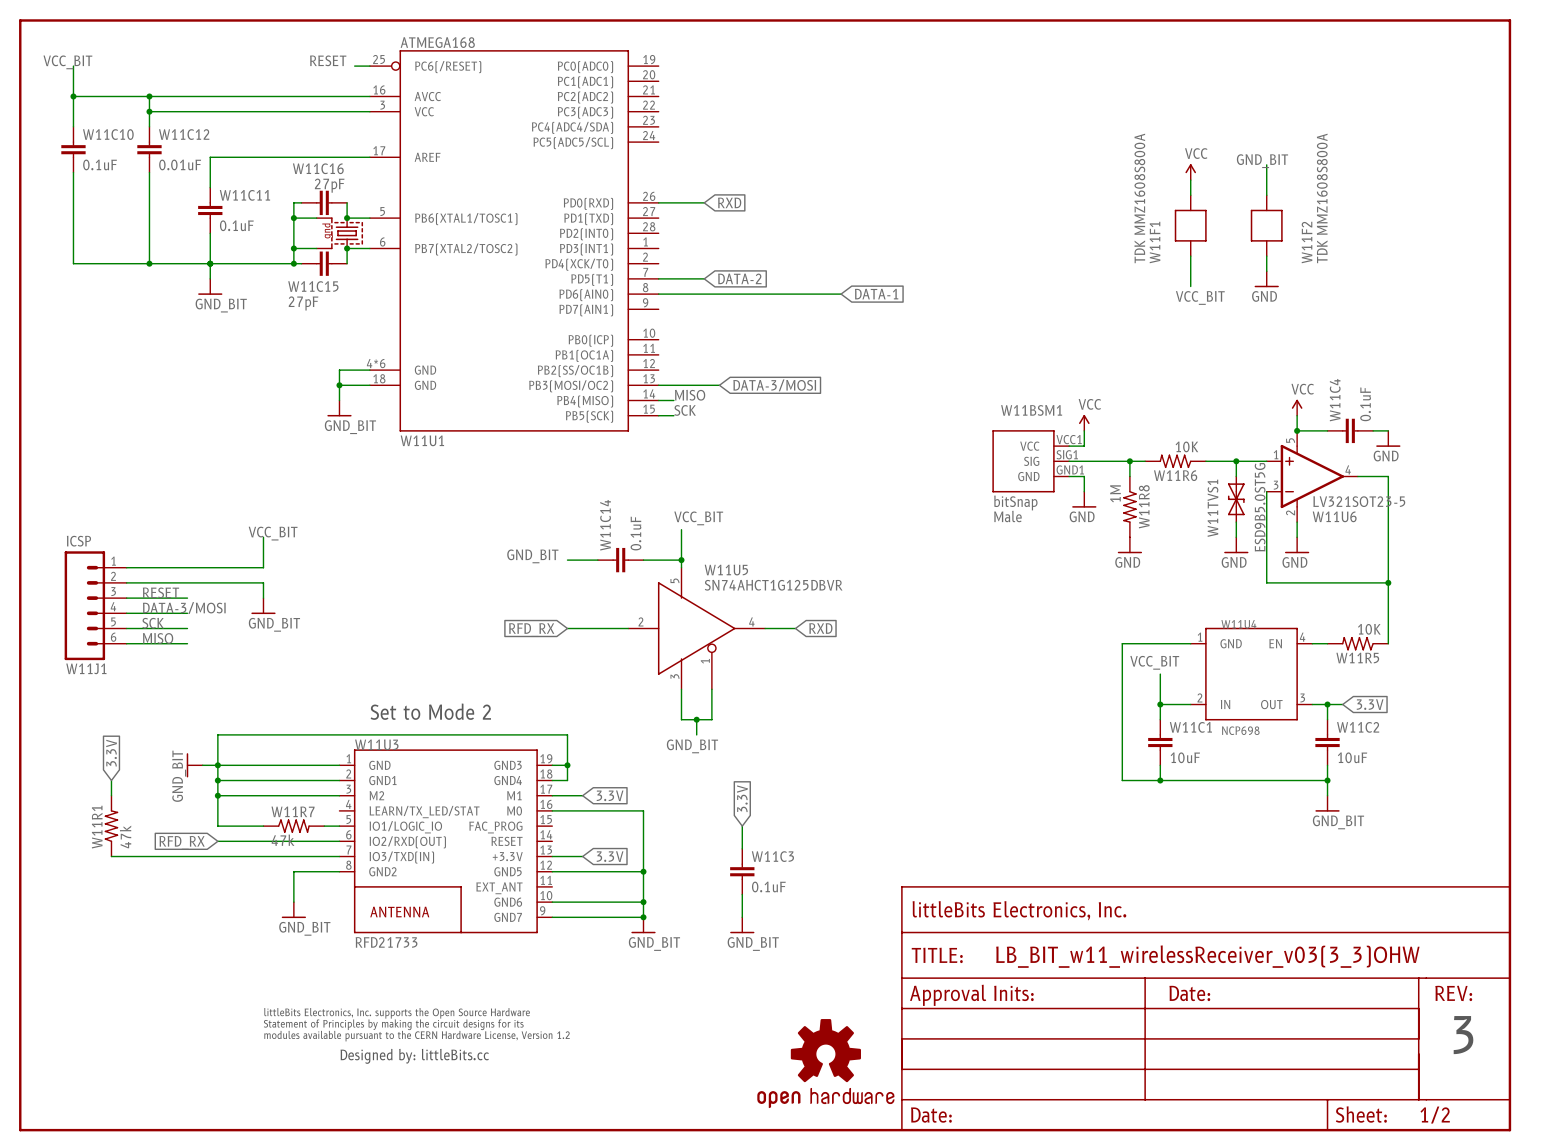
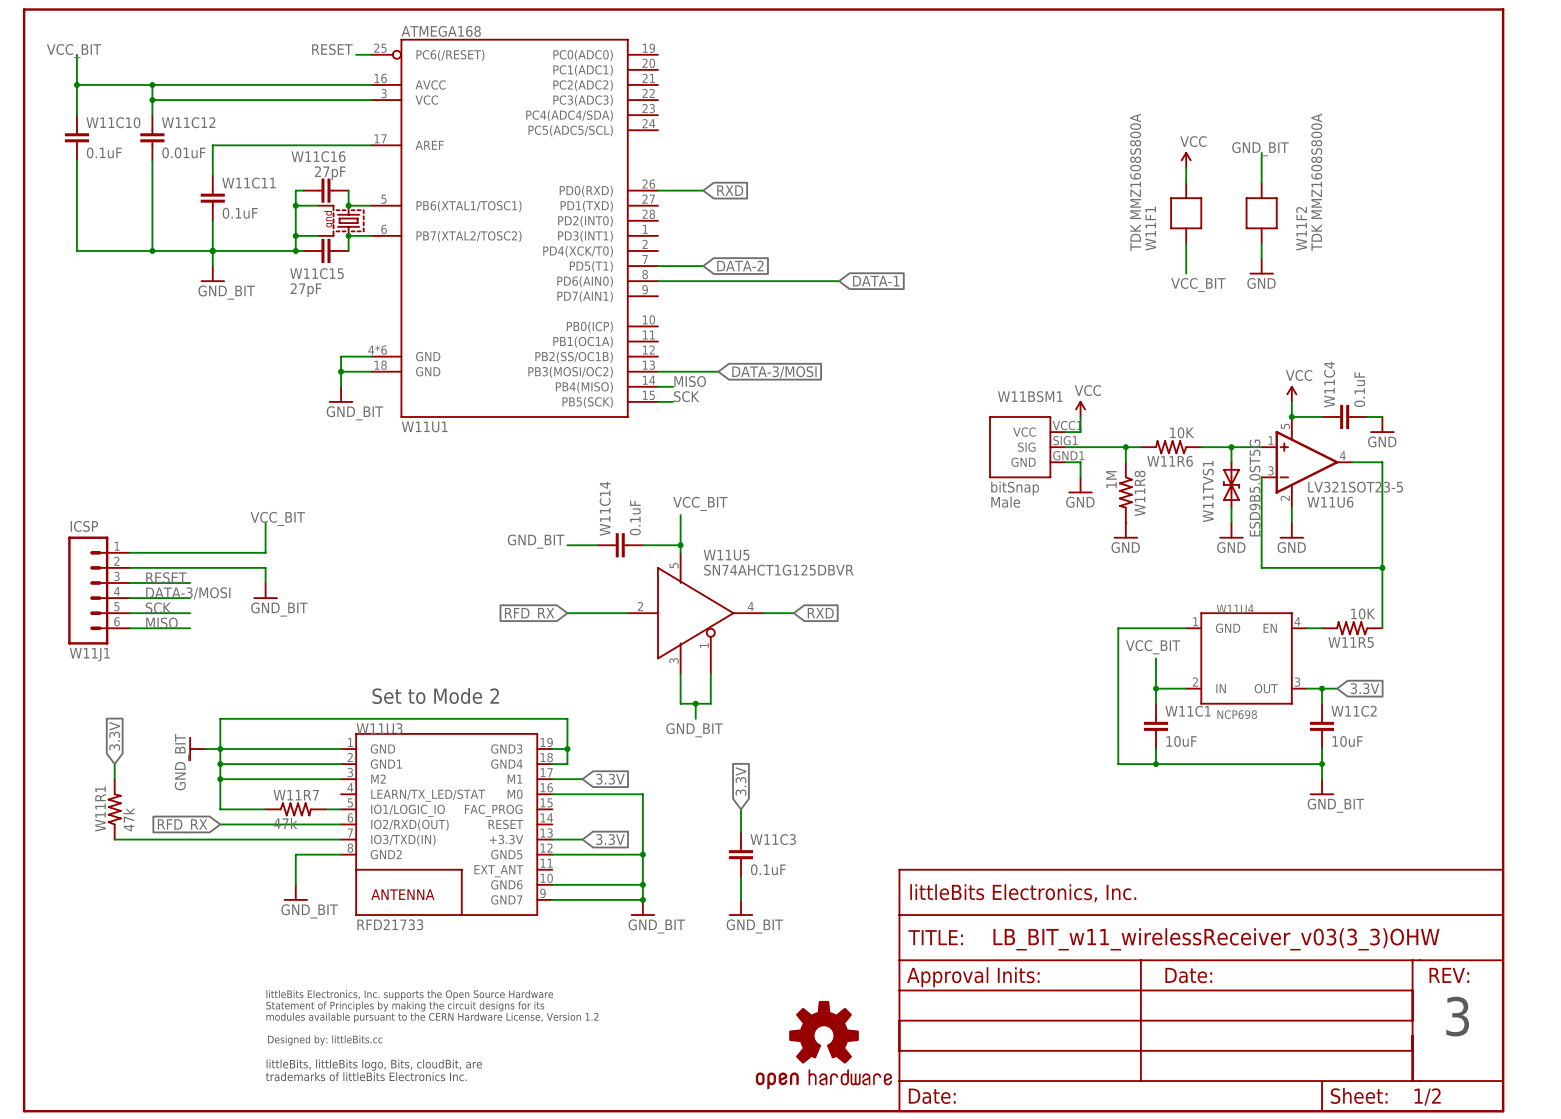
part: (416, 1035) -> none
part: none -> (432, 1035)

